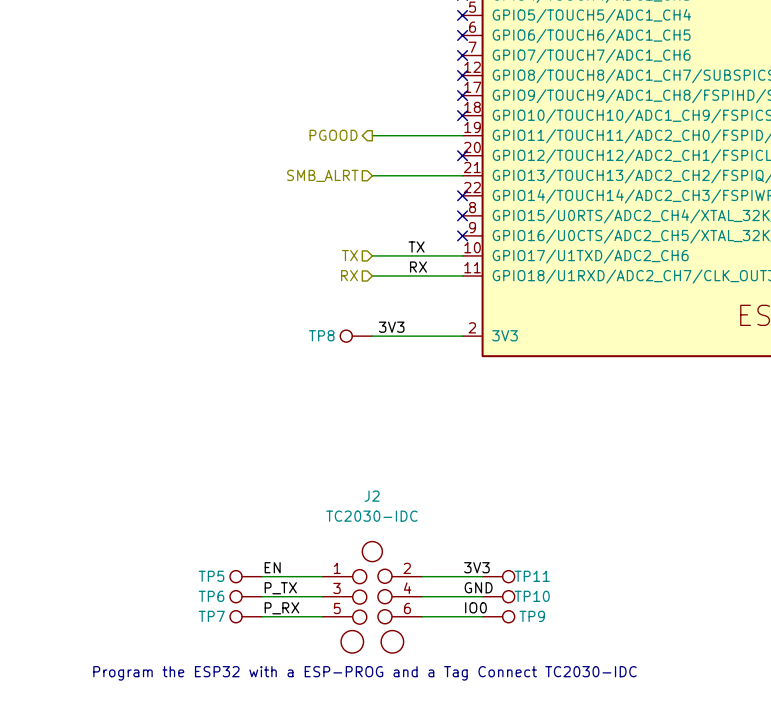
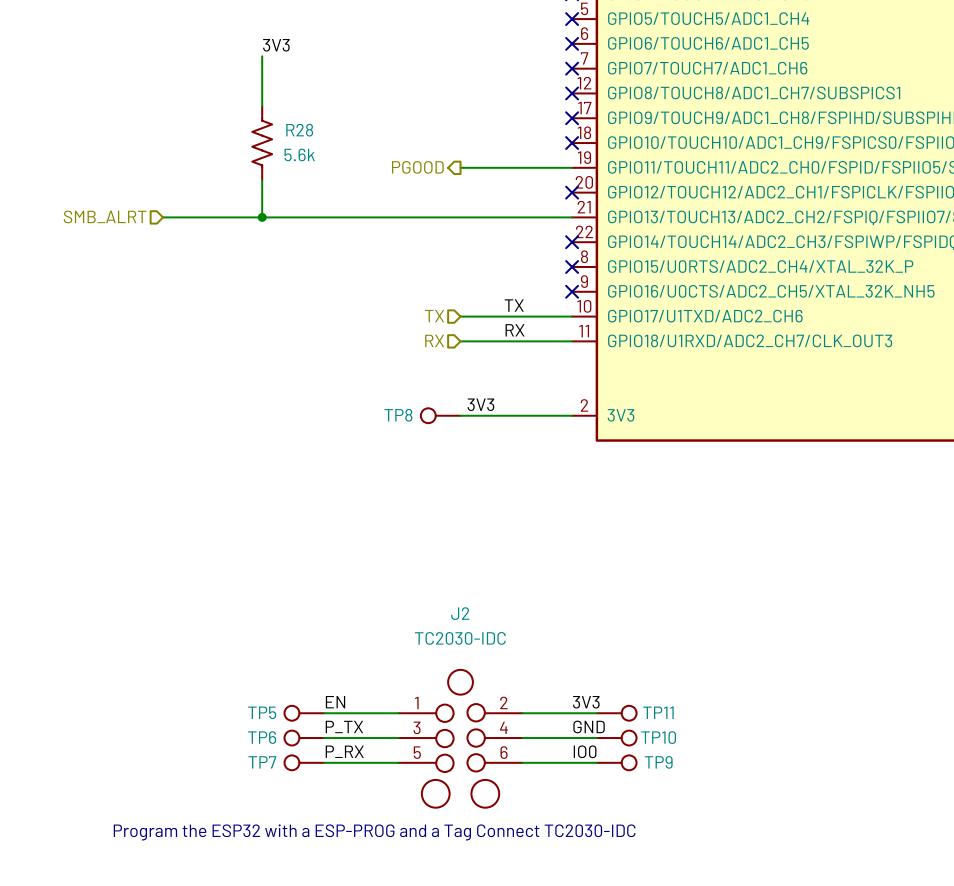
label: none -> 3V3 (276, 45)
wire: none -> (262, 56) (262, 105)
R28: none -> 5.6k (262, 143)
wire: none -> (262, 180) (262, 217)
hierarchical label: none -> SMB_ALRT (105, 216)
wire: none -> (163, 217) (460, 217)
junction: none -> (262, 217)
hierarchical label: SMB_ALRT (322, 175) -> none

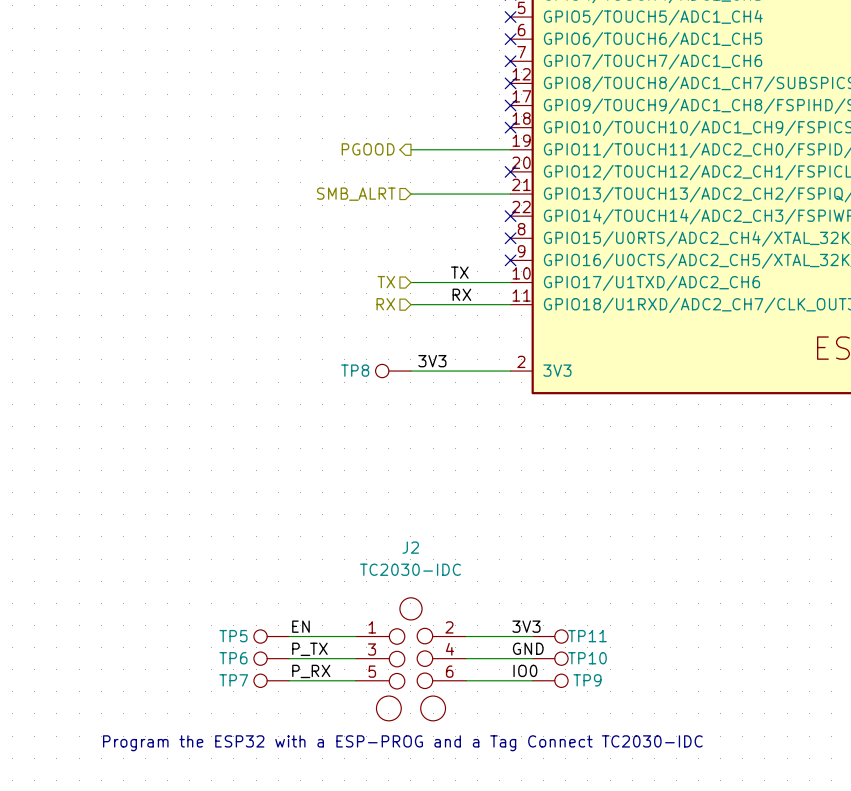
label: 3V3 (276, 45) -> none
wire: (262, 56) (262, 105) -> none
R28: 5.6k (262, 143) -> none
wire: (262, 180) (262, 217) -> none
hierarchical label: SMB_ALRT (105, 216) -> none
hierarchical label: none -> SMB_ALRT (356, 194)
wire: (163, 217) (460, 217) -> none
junction: (262, 217) -> none

